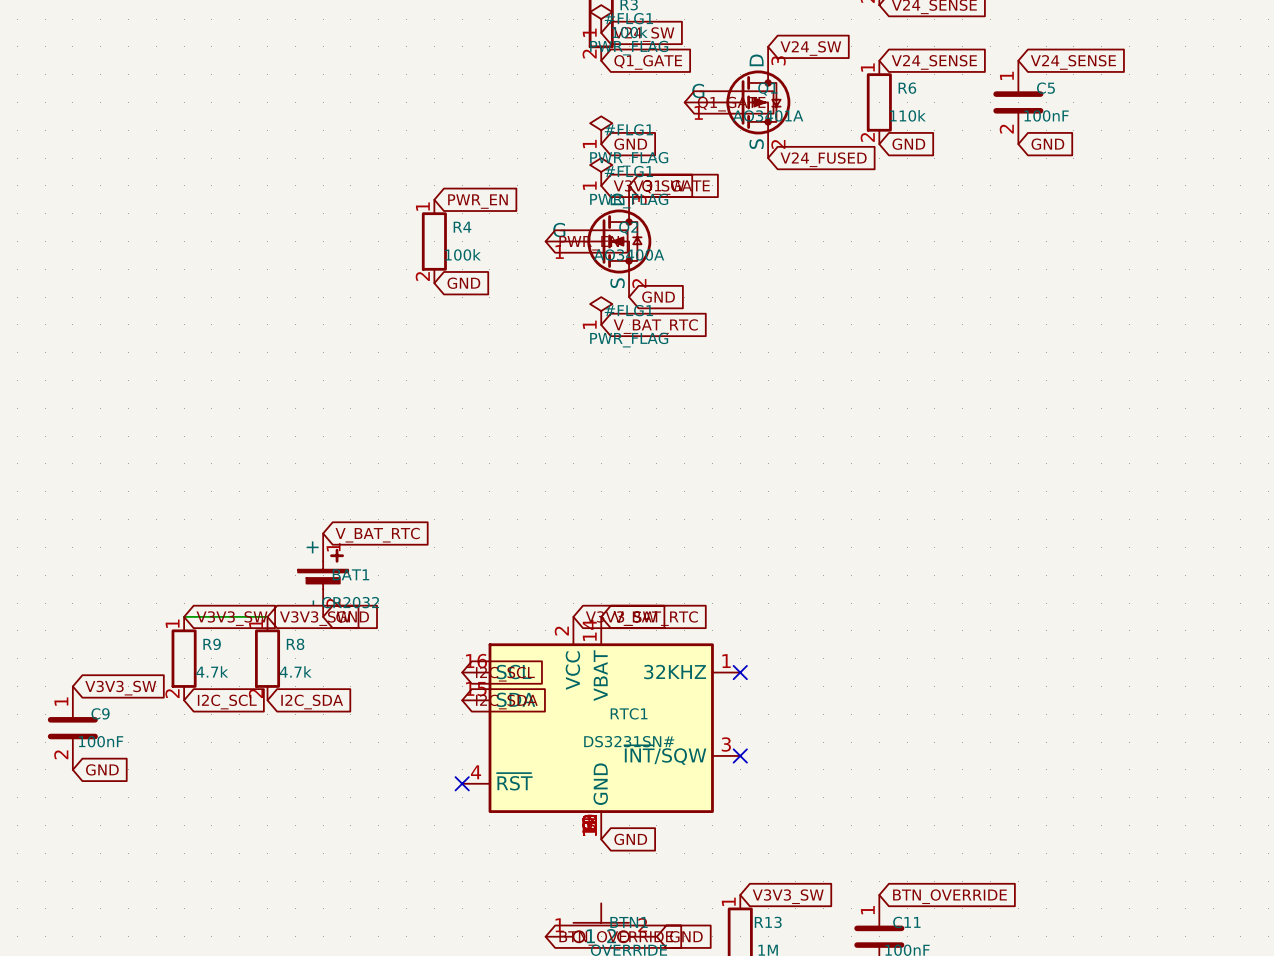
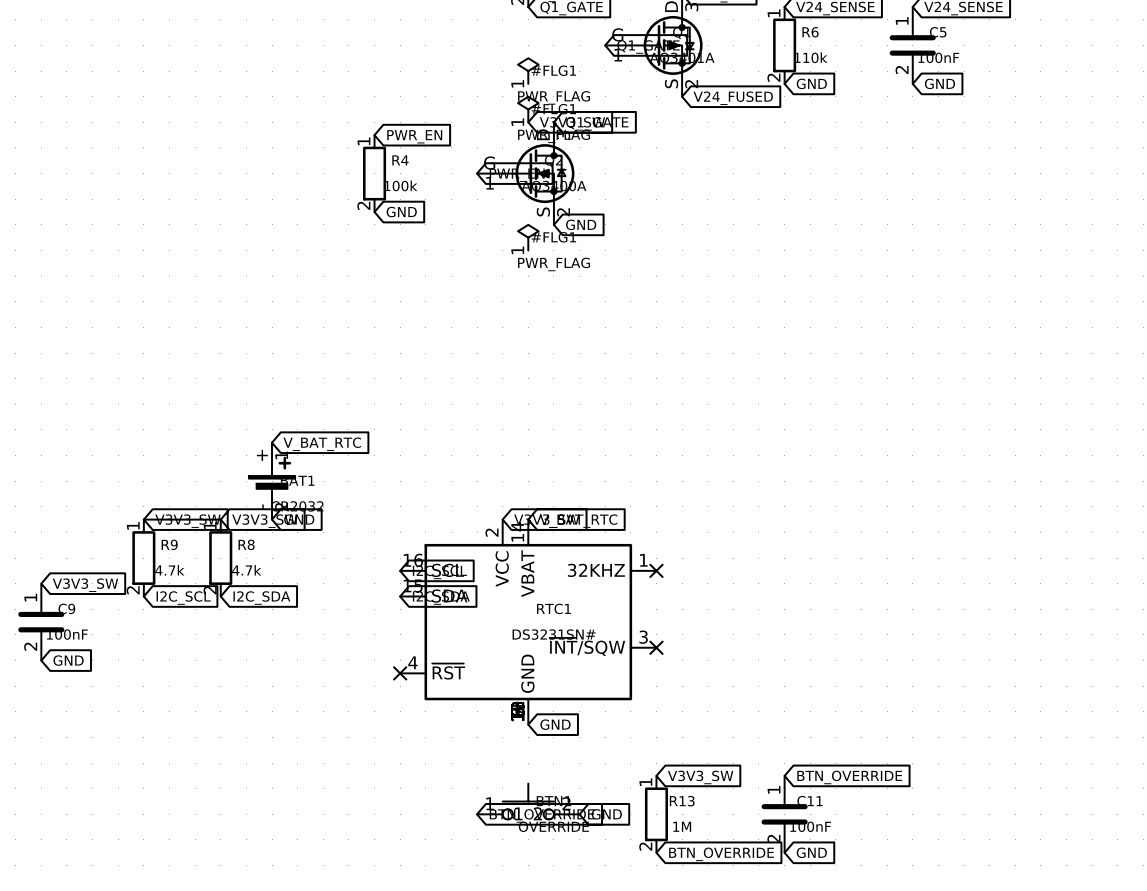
global label: GND (630, 144) -> none
global label: V_BAT_RTC (655, 326) -> none

